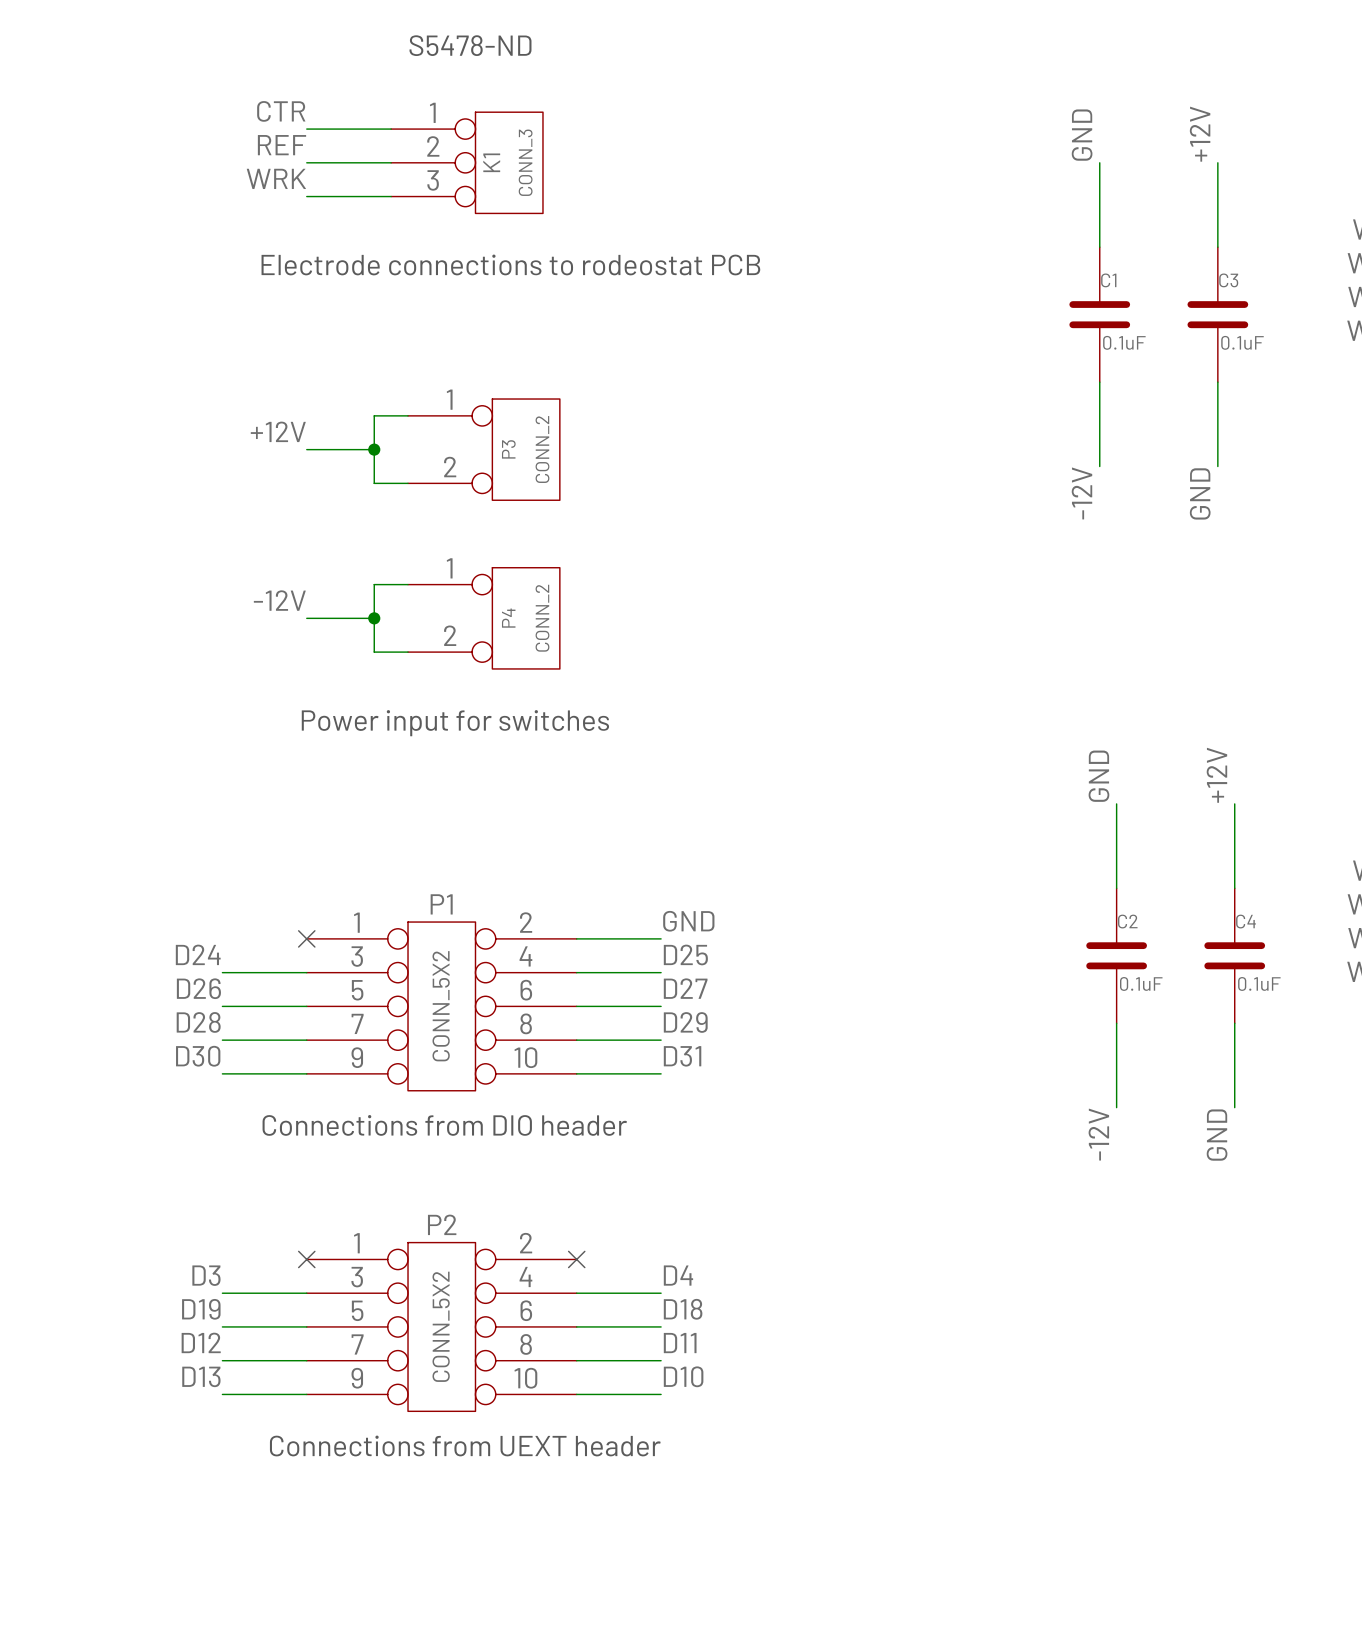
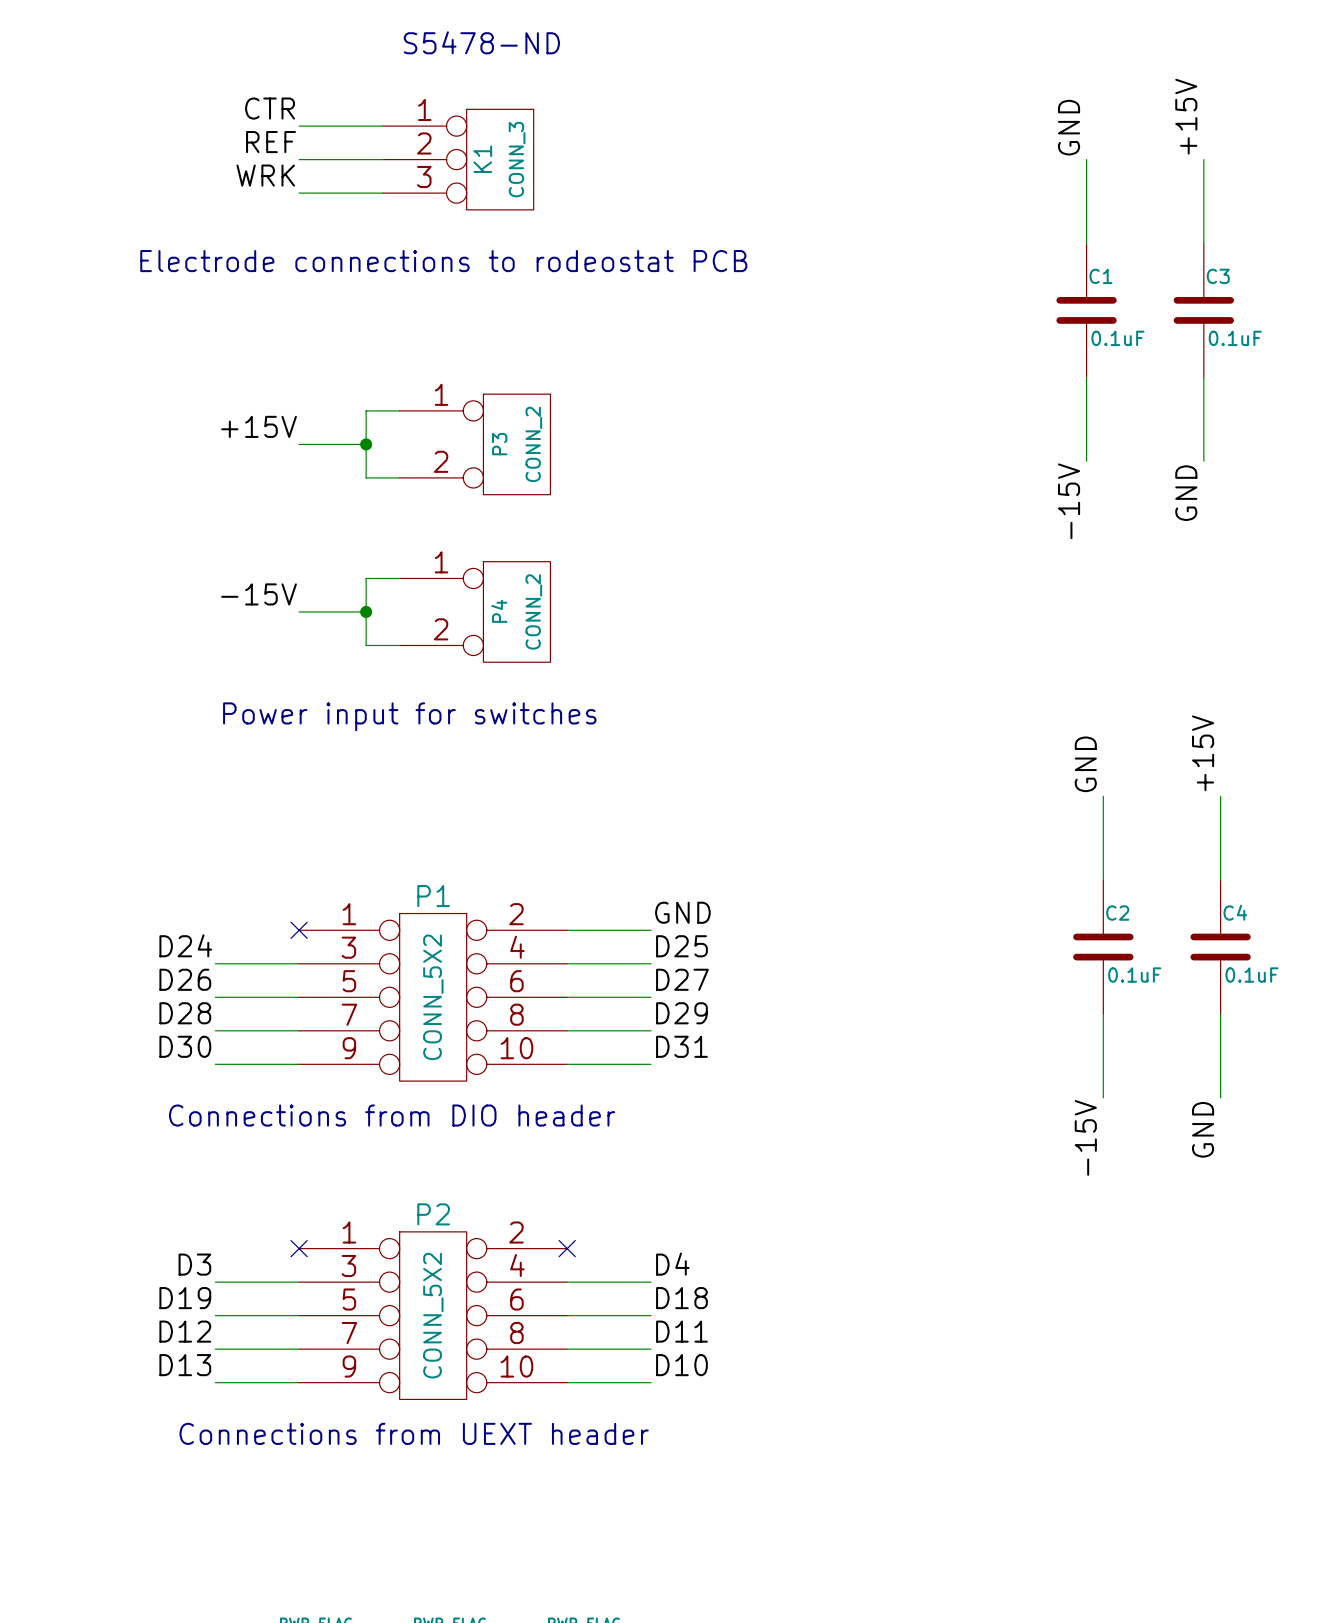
label: +12V (1200, 134) -> +15V (1186, 116)
label: +12V (278, 431) -> +15V (259, 426)
label: -12V (1081, 493) -> -15V (1069, 501)
label: -12V (279, 600) -> -15V (259, 594)
label: +12V (1216, 775) -> +15V (1203, 753)
label: -12V (1098, 1134) -> -15V (1085, 1137)

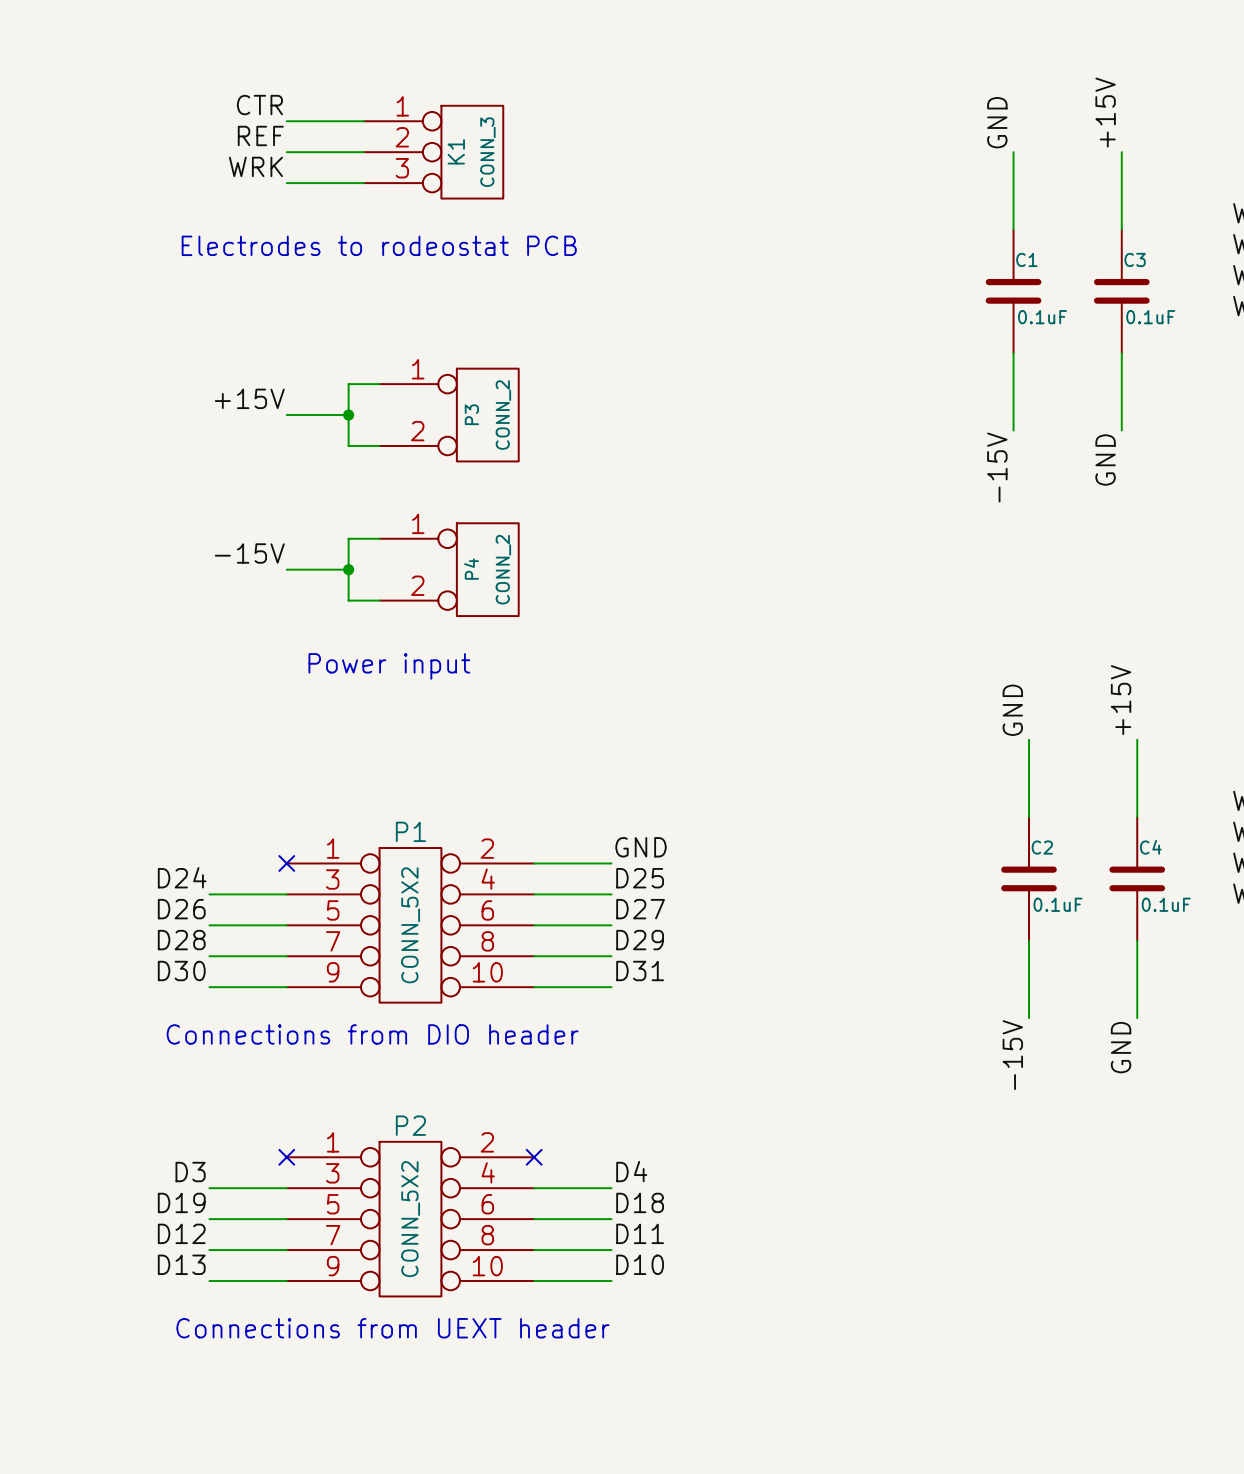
text: S5478-ND (481, 42) -> none
text: Electrode connections to rodeostat PCB (443, 261) -> Electrodes to rodeostat PCB (379, 245)
text: Power input for switches (409, 716) -> Power input (389, 666)

